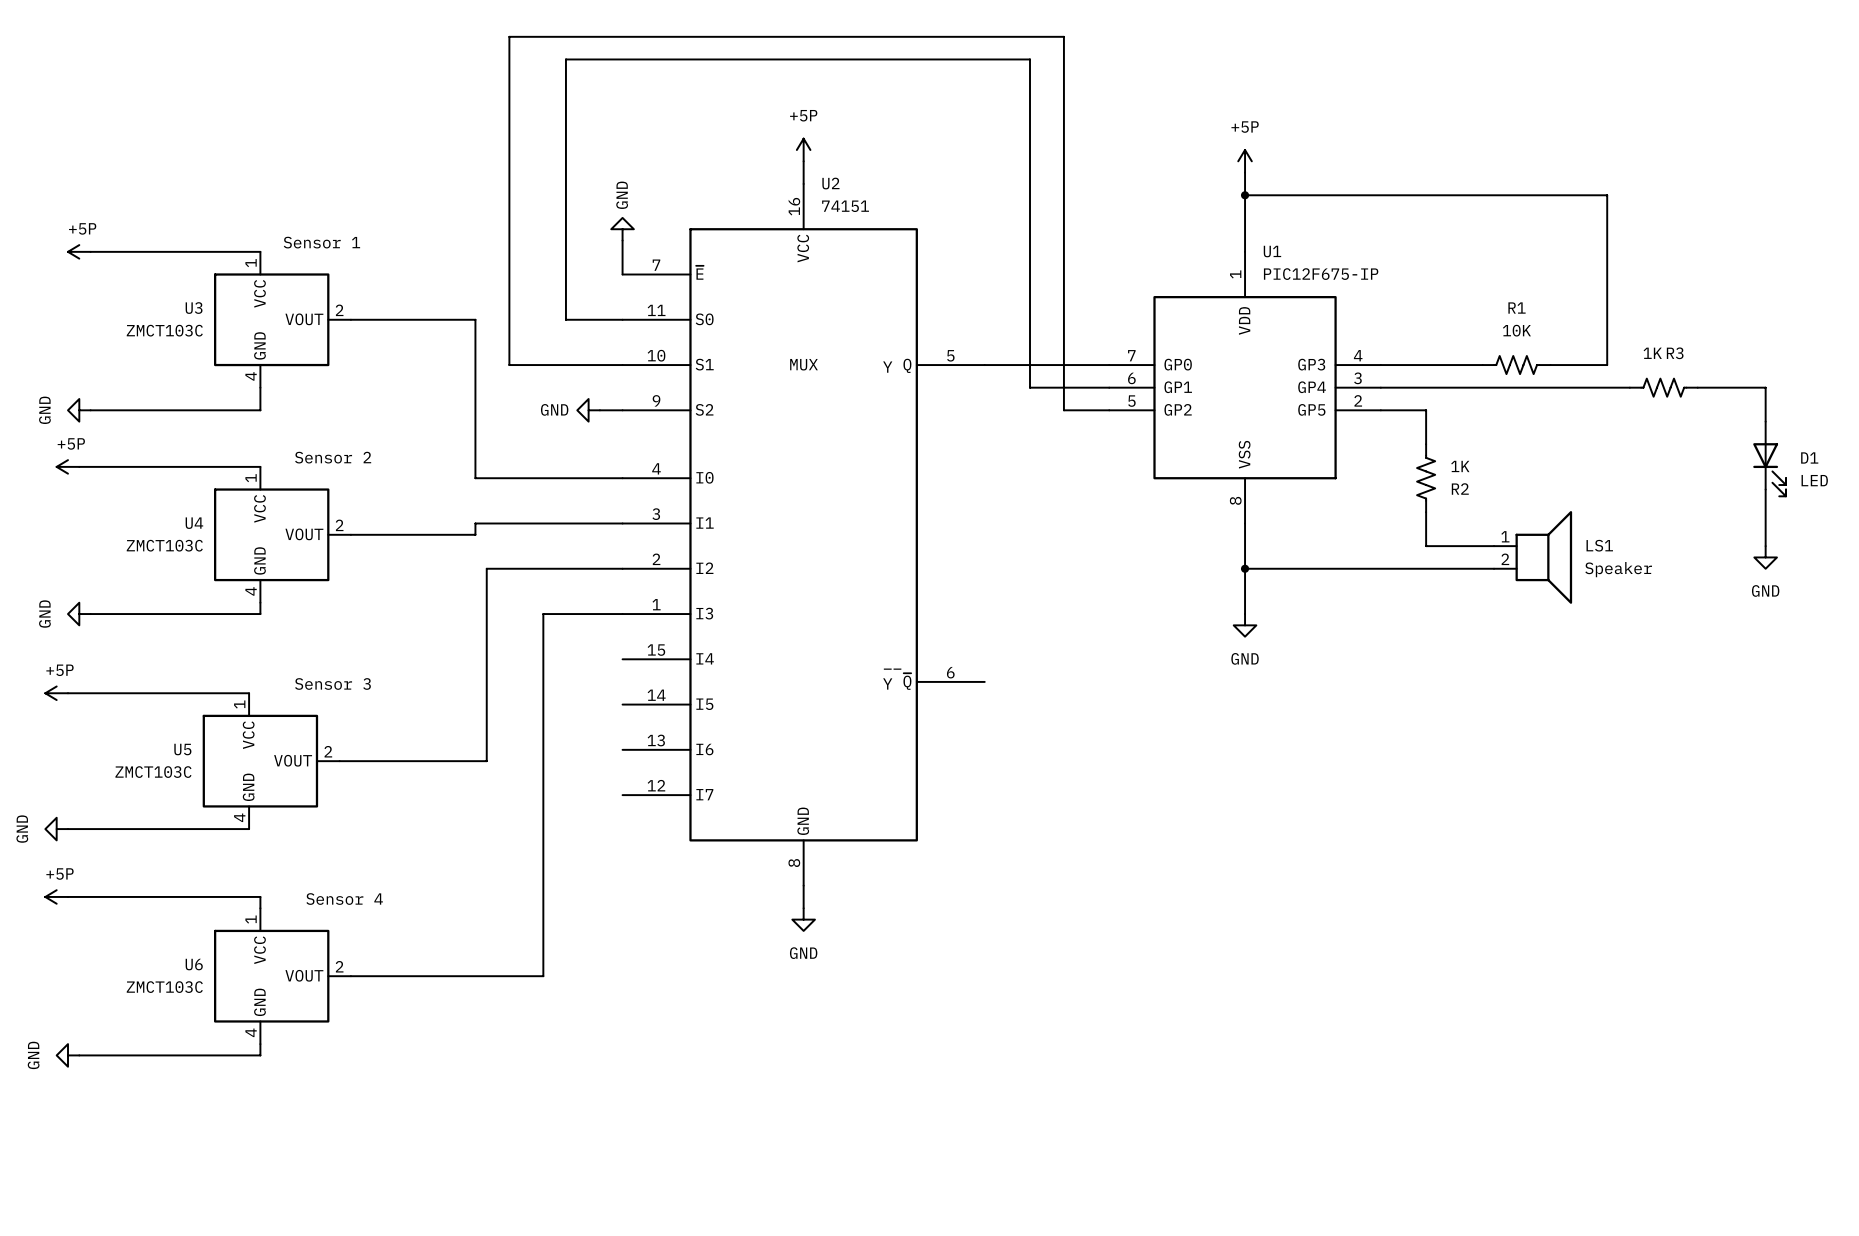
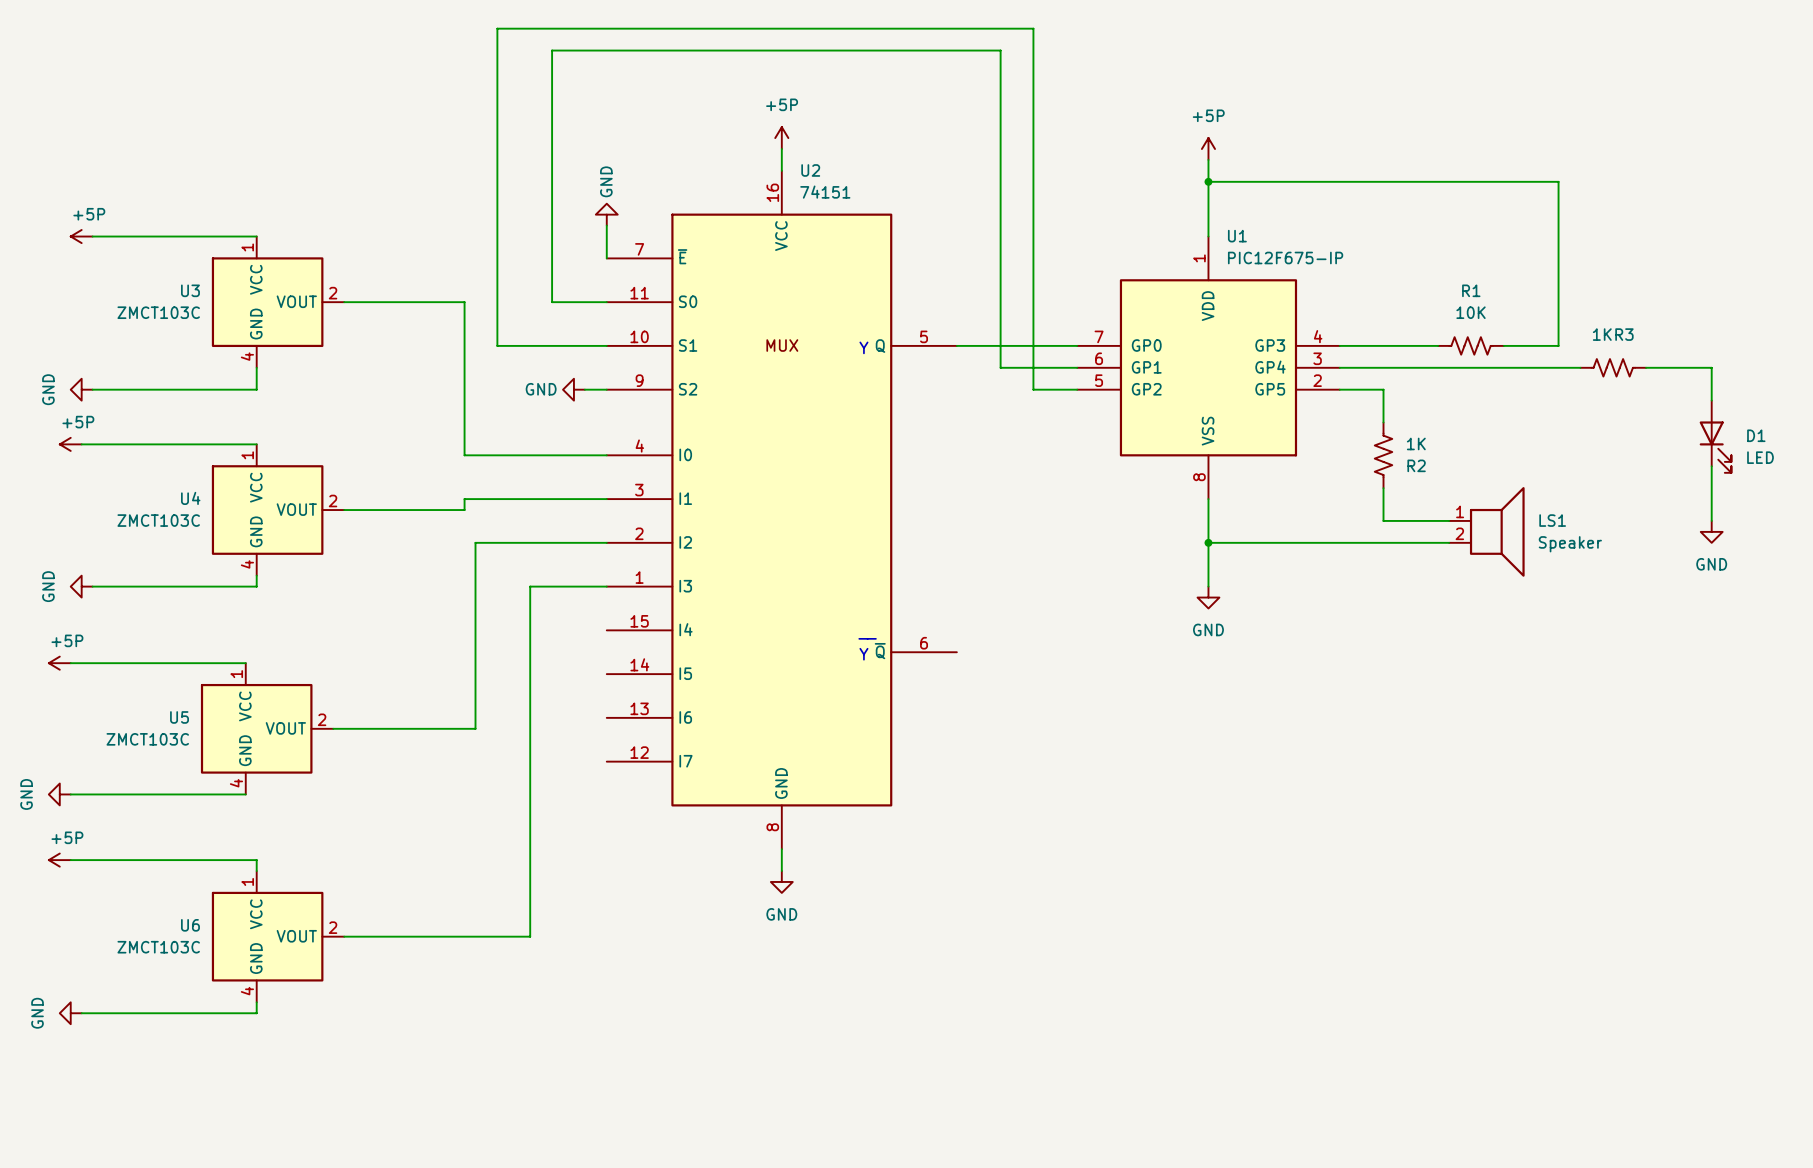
text: Sensor 1 (321, 242) -> none
text: Sensor 2 (333, 457) -> none
text: Sensor 3 (332, 683) -> none
text: Sensor 4 (344, 899) -> none

